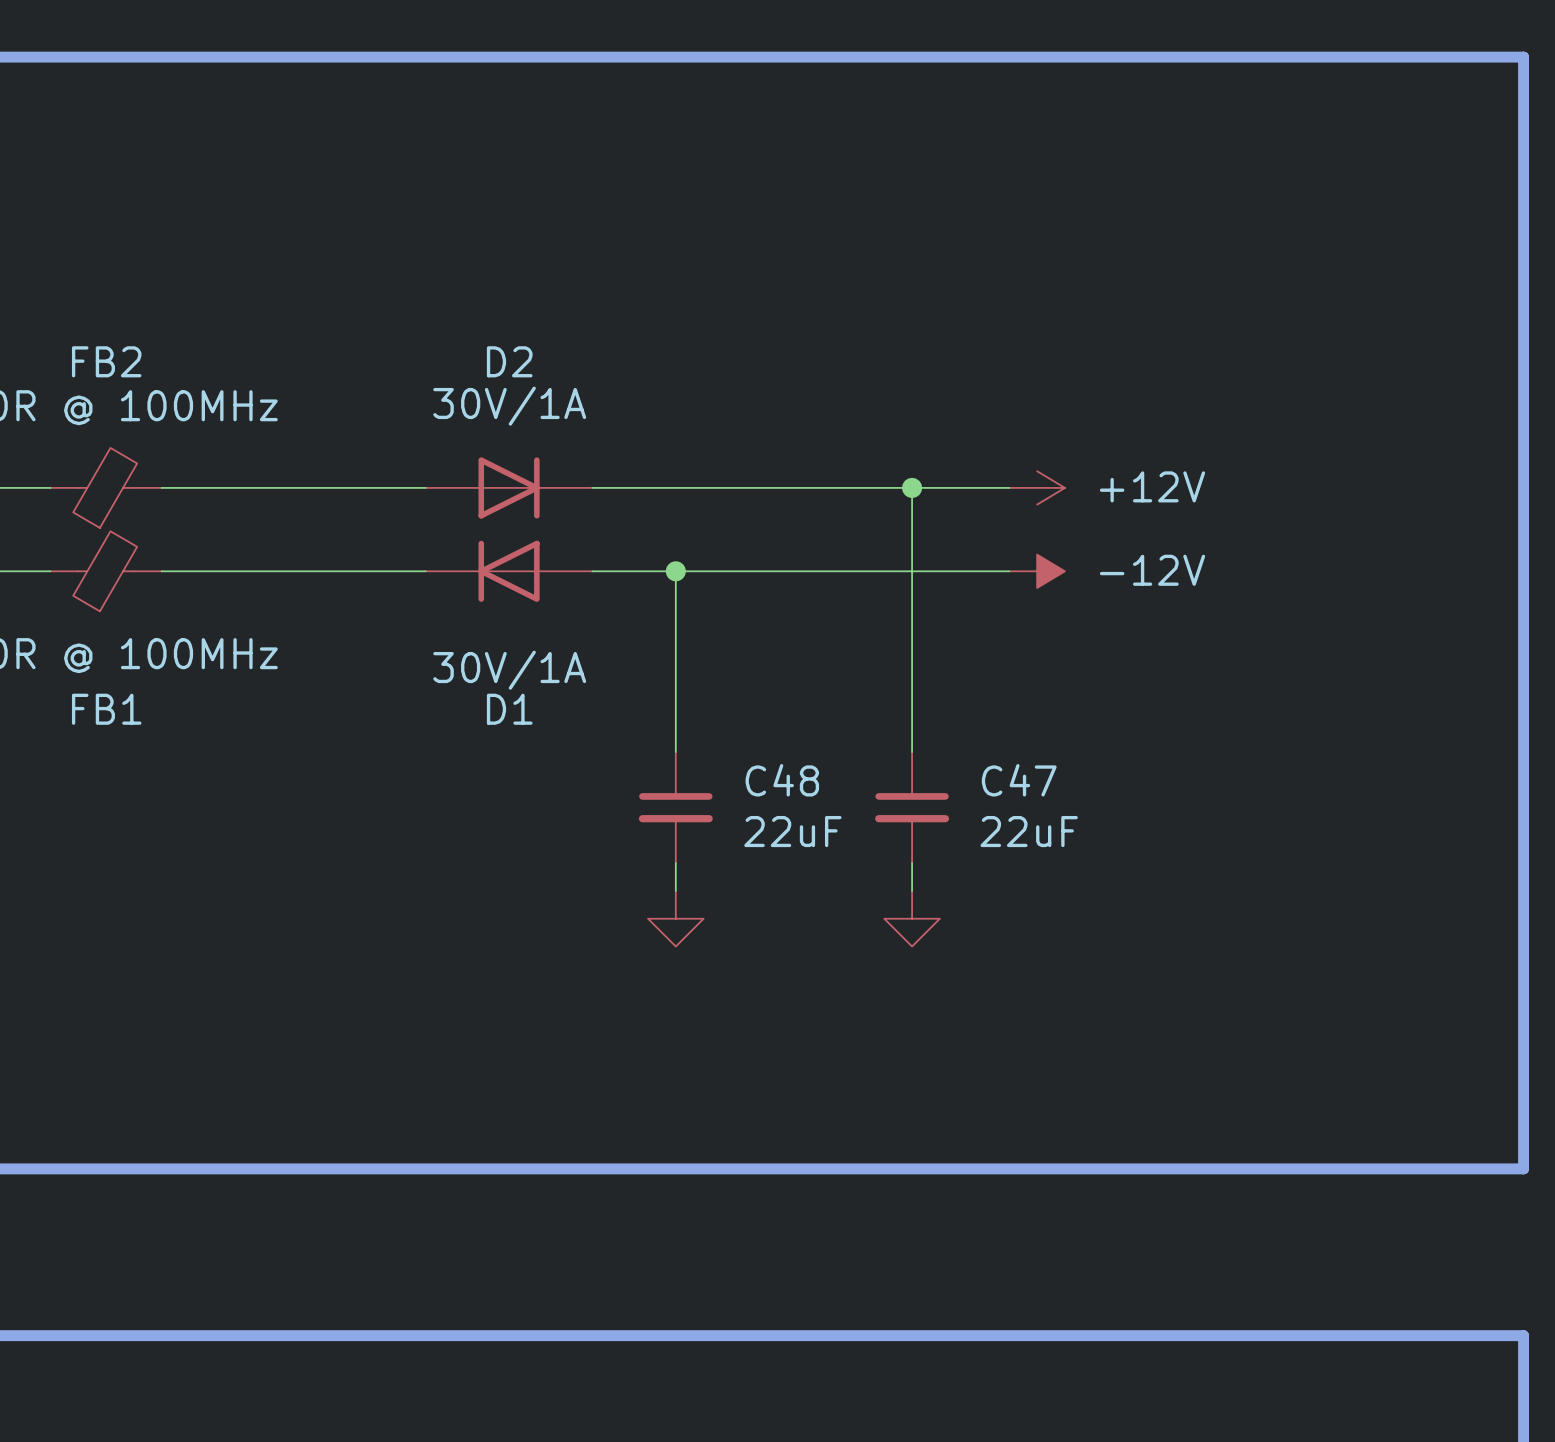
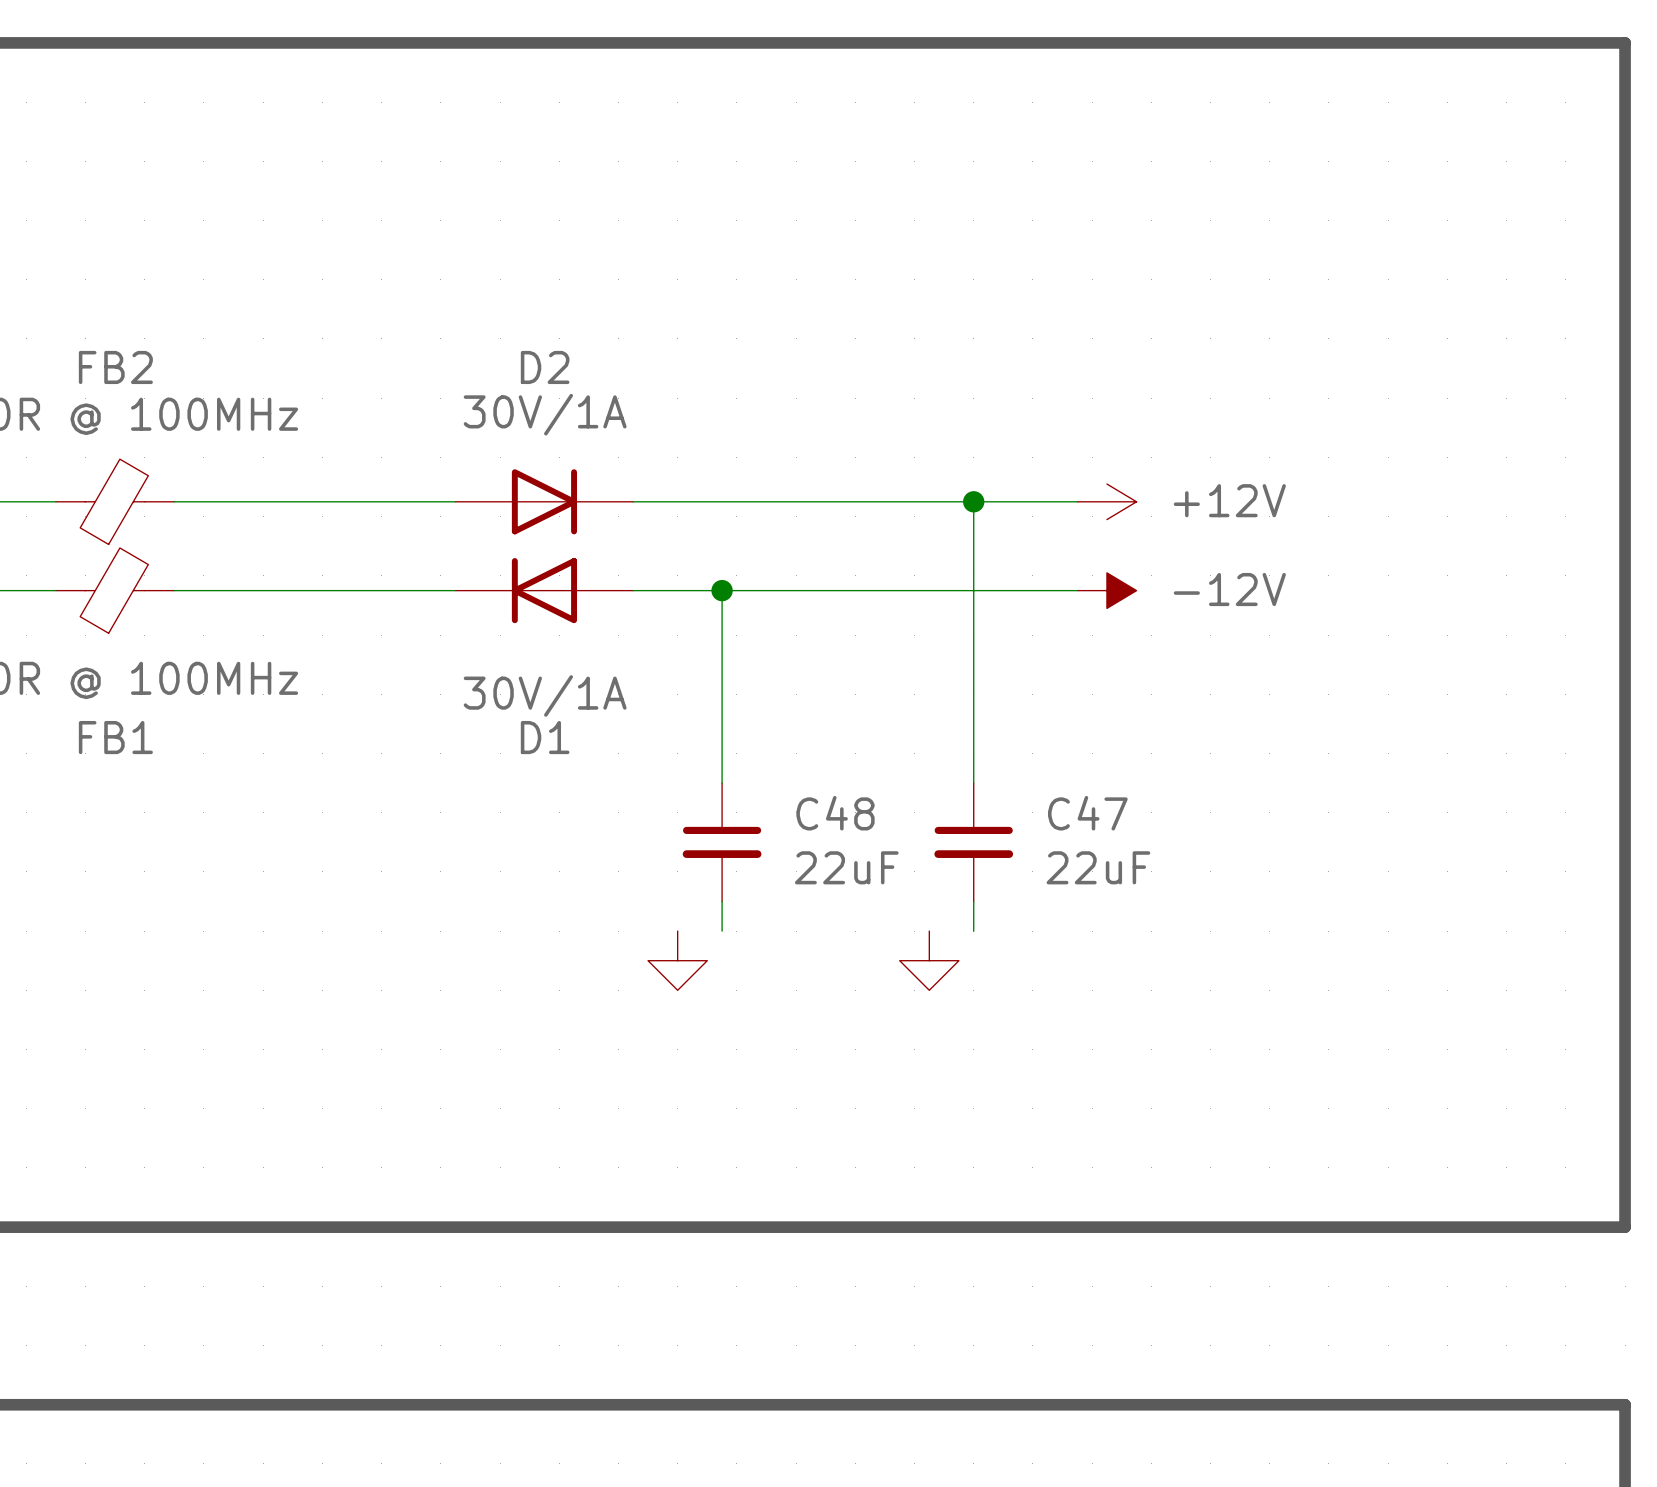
power symbol position: (675, 918) -> (677, 960)
power symbol position: (912, 918) -> (929, 960)

